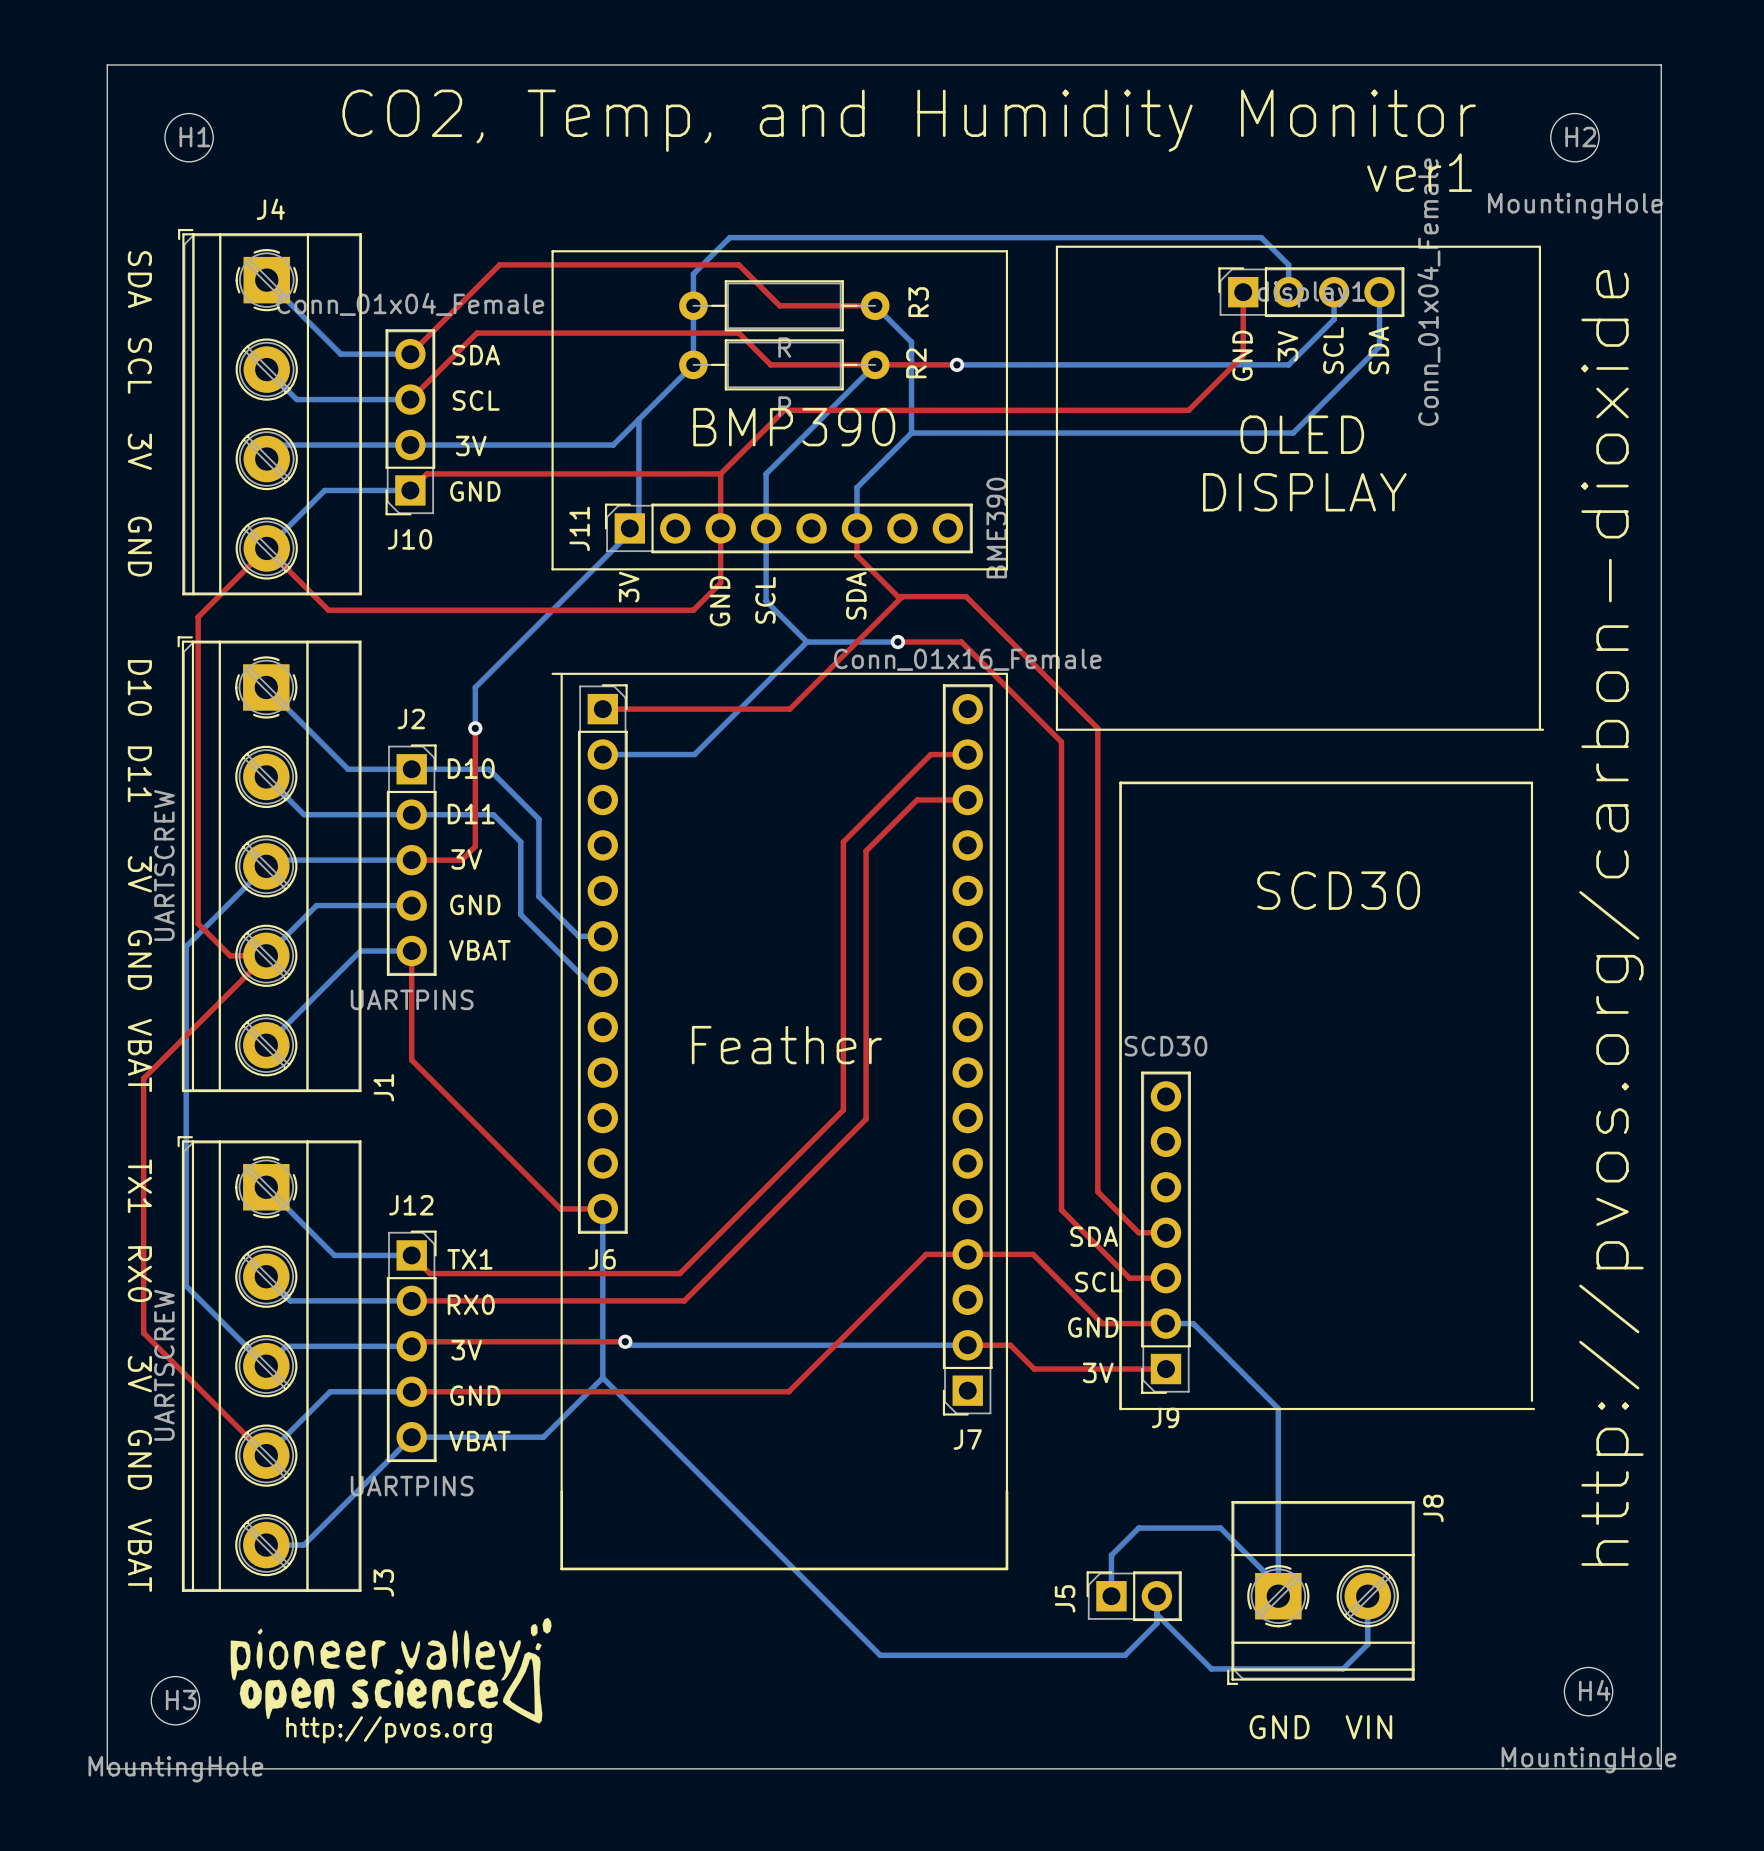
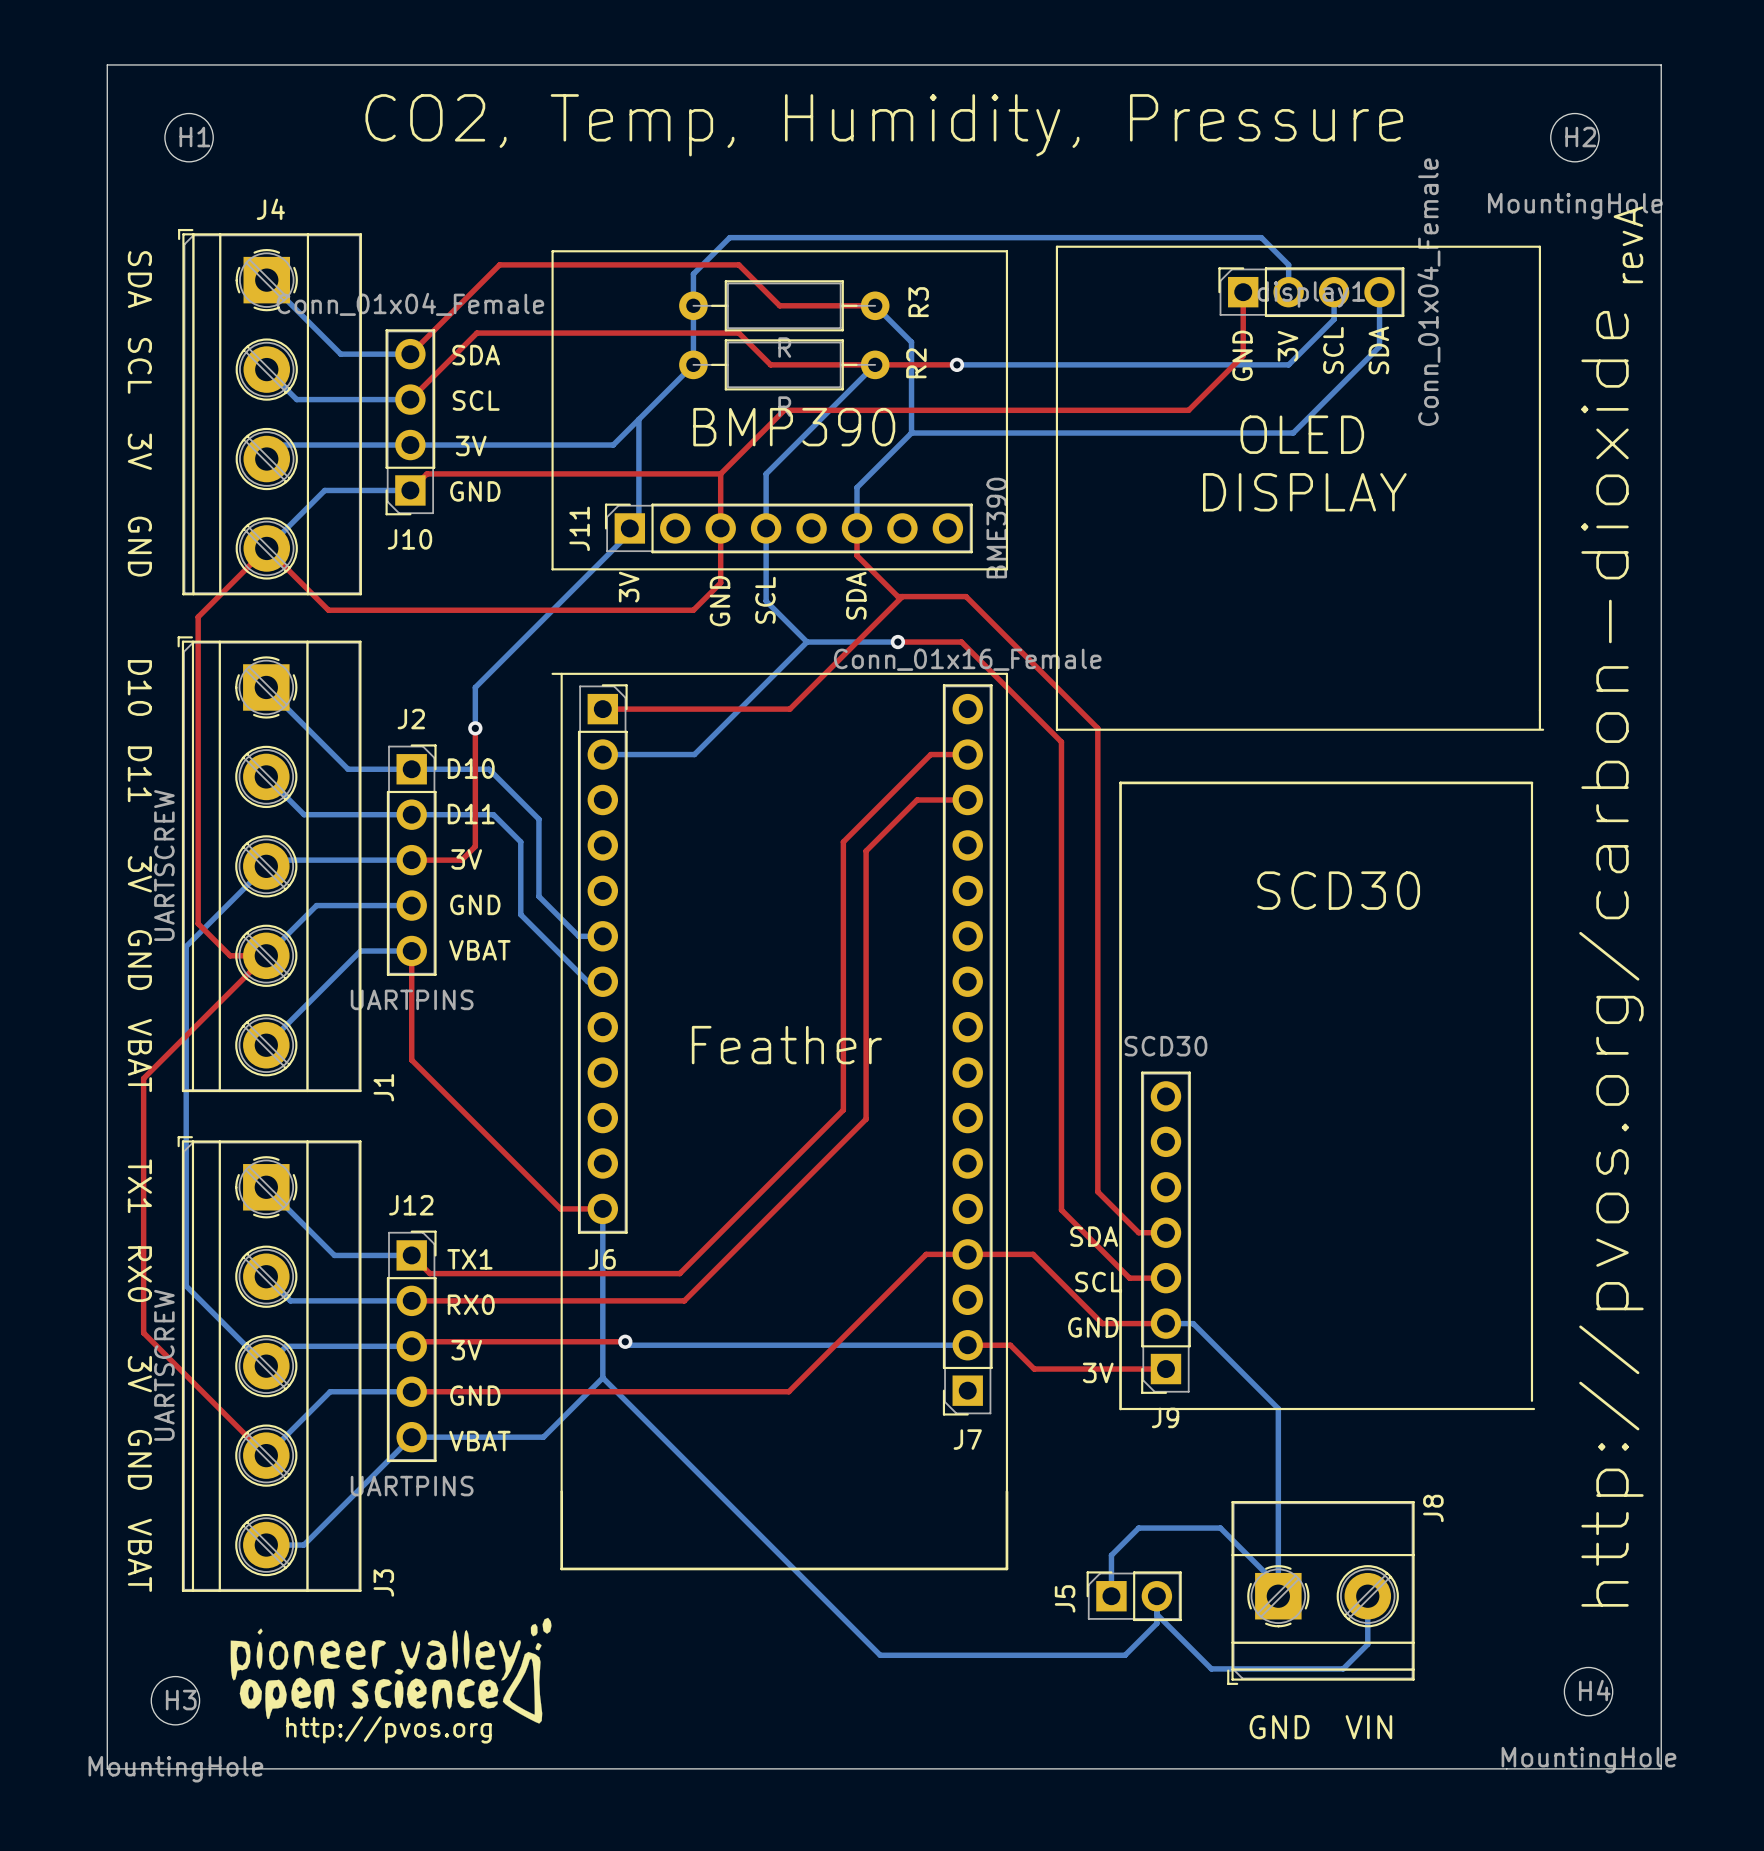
text: CO2, Temp, and Humidity Monitor (909, 120) -> CO2, Temp, Humidity, Pressure (884, 125)
text: ver1 (1419, 172) -> none
text: none -> revA (1628, 244)
text position: http://pvos.org/carbon-dioxide (1611, 917) -> http://pvos.org/carbon-dioxide (1611, 958)

